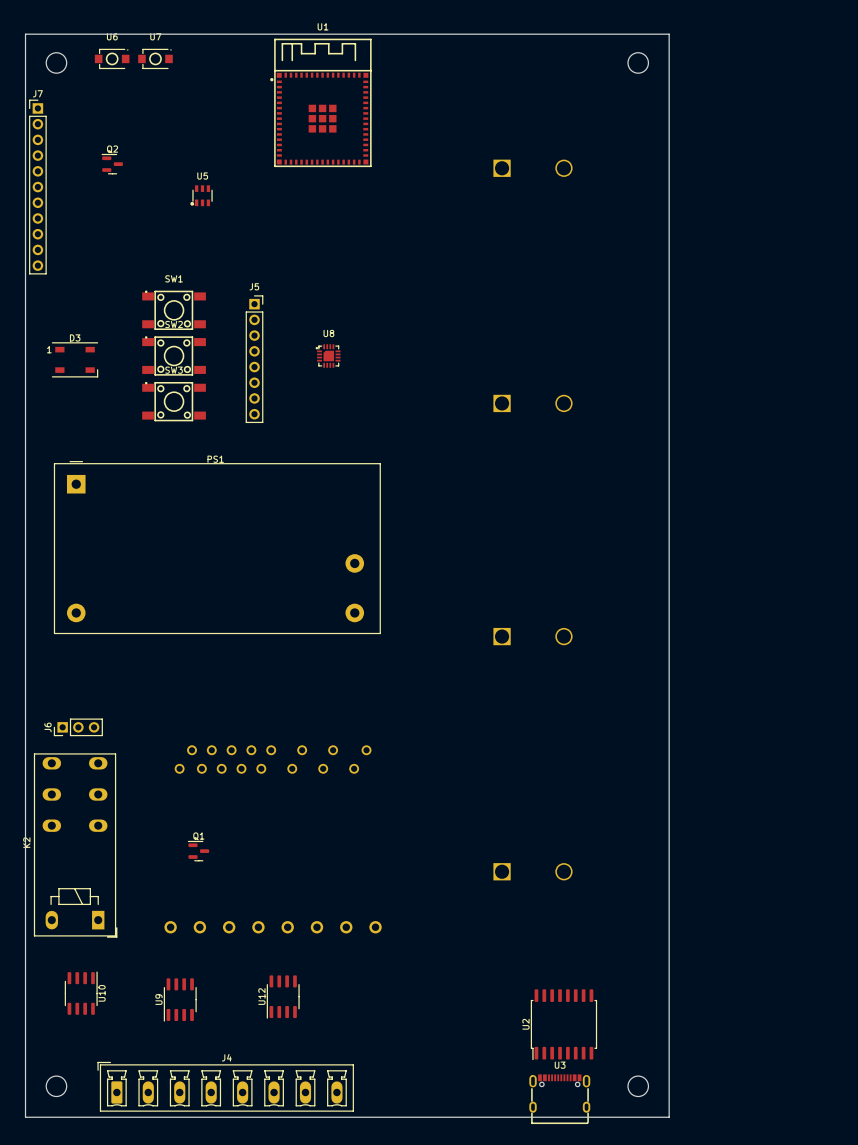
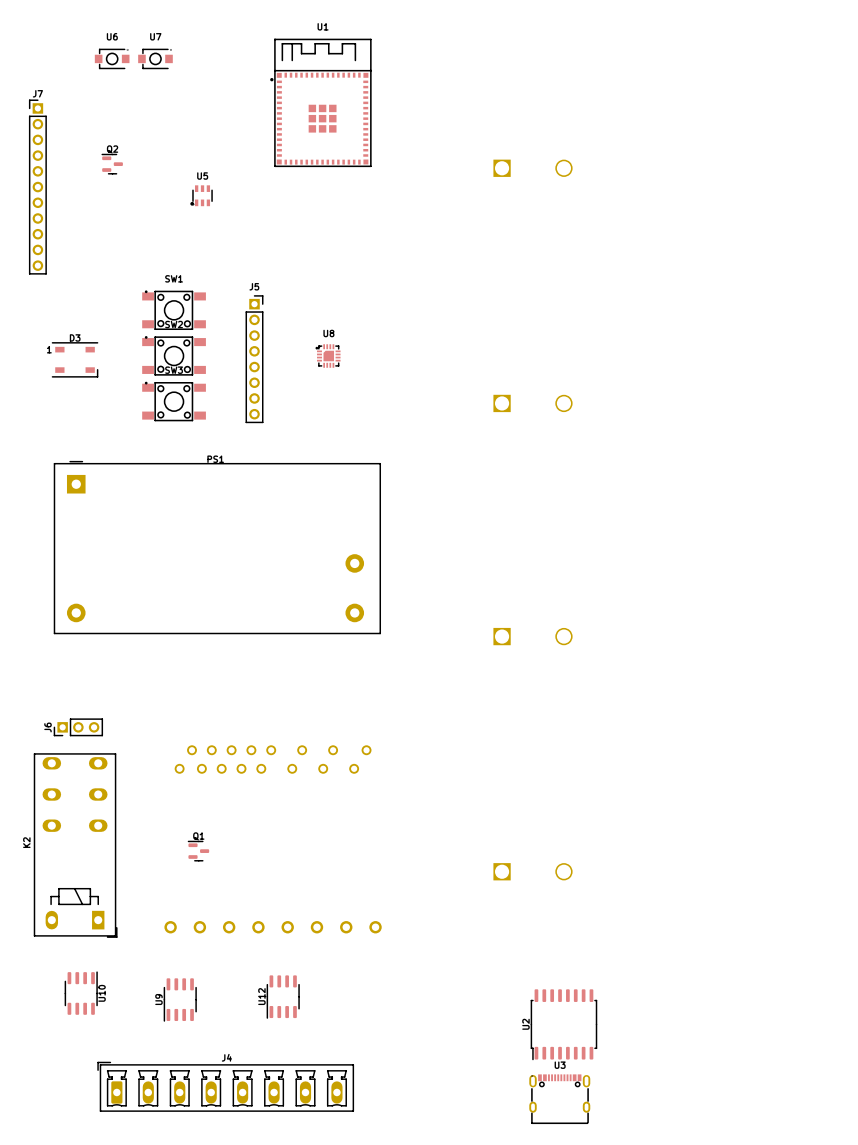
board edge: (25, 34) (669, 34) (669, 1117) (25, 1117) (25, 34) -> none
round board edge: [45, 52, 67, 74] -> none
round board edge: [627, 52, 649, 74] -> none
round board edge: [45, 1075, 67, 1097] -> none
round board edge: [627, 1075, 649, 1097] -> none

